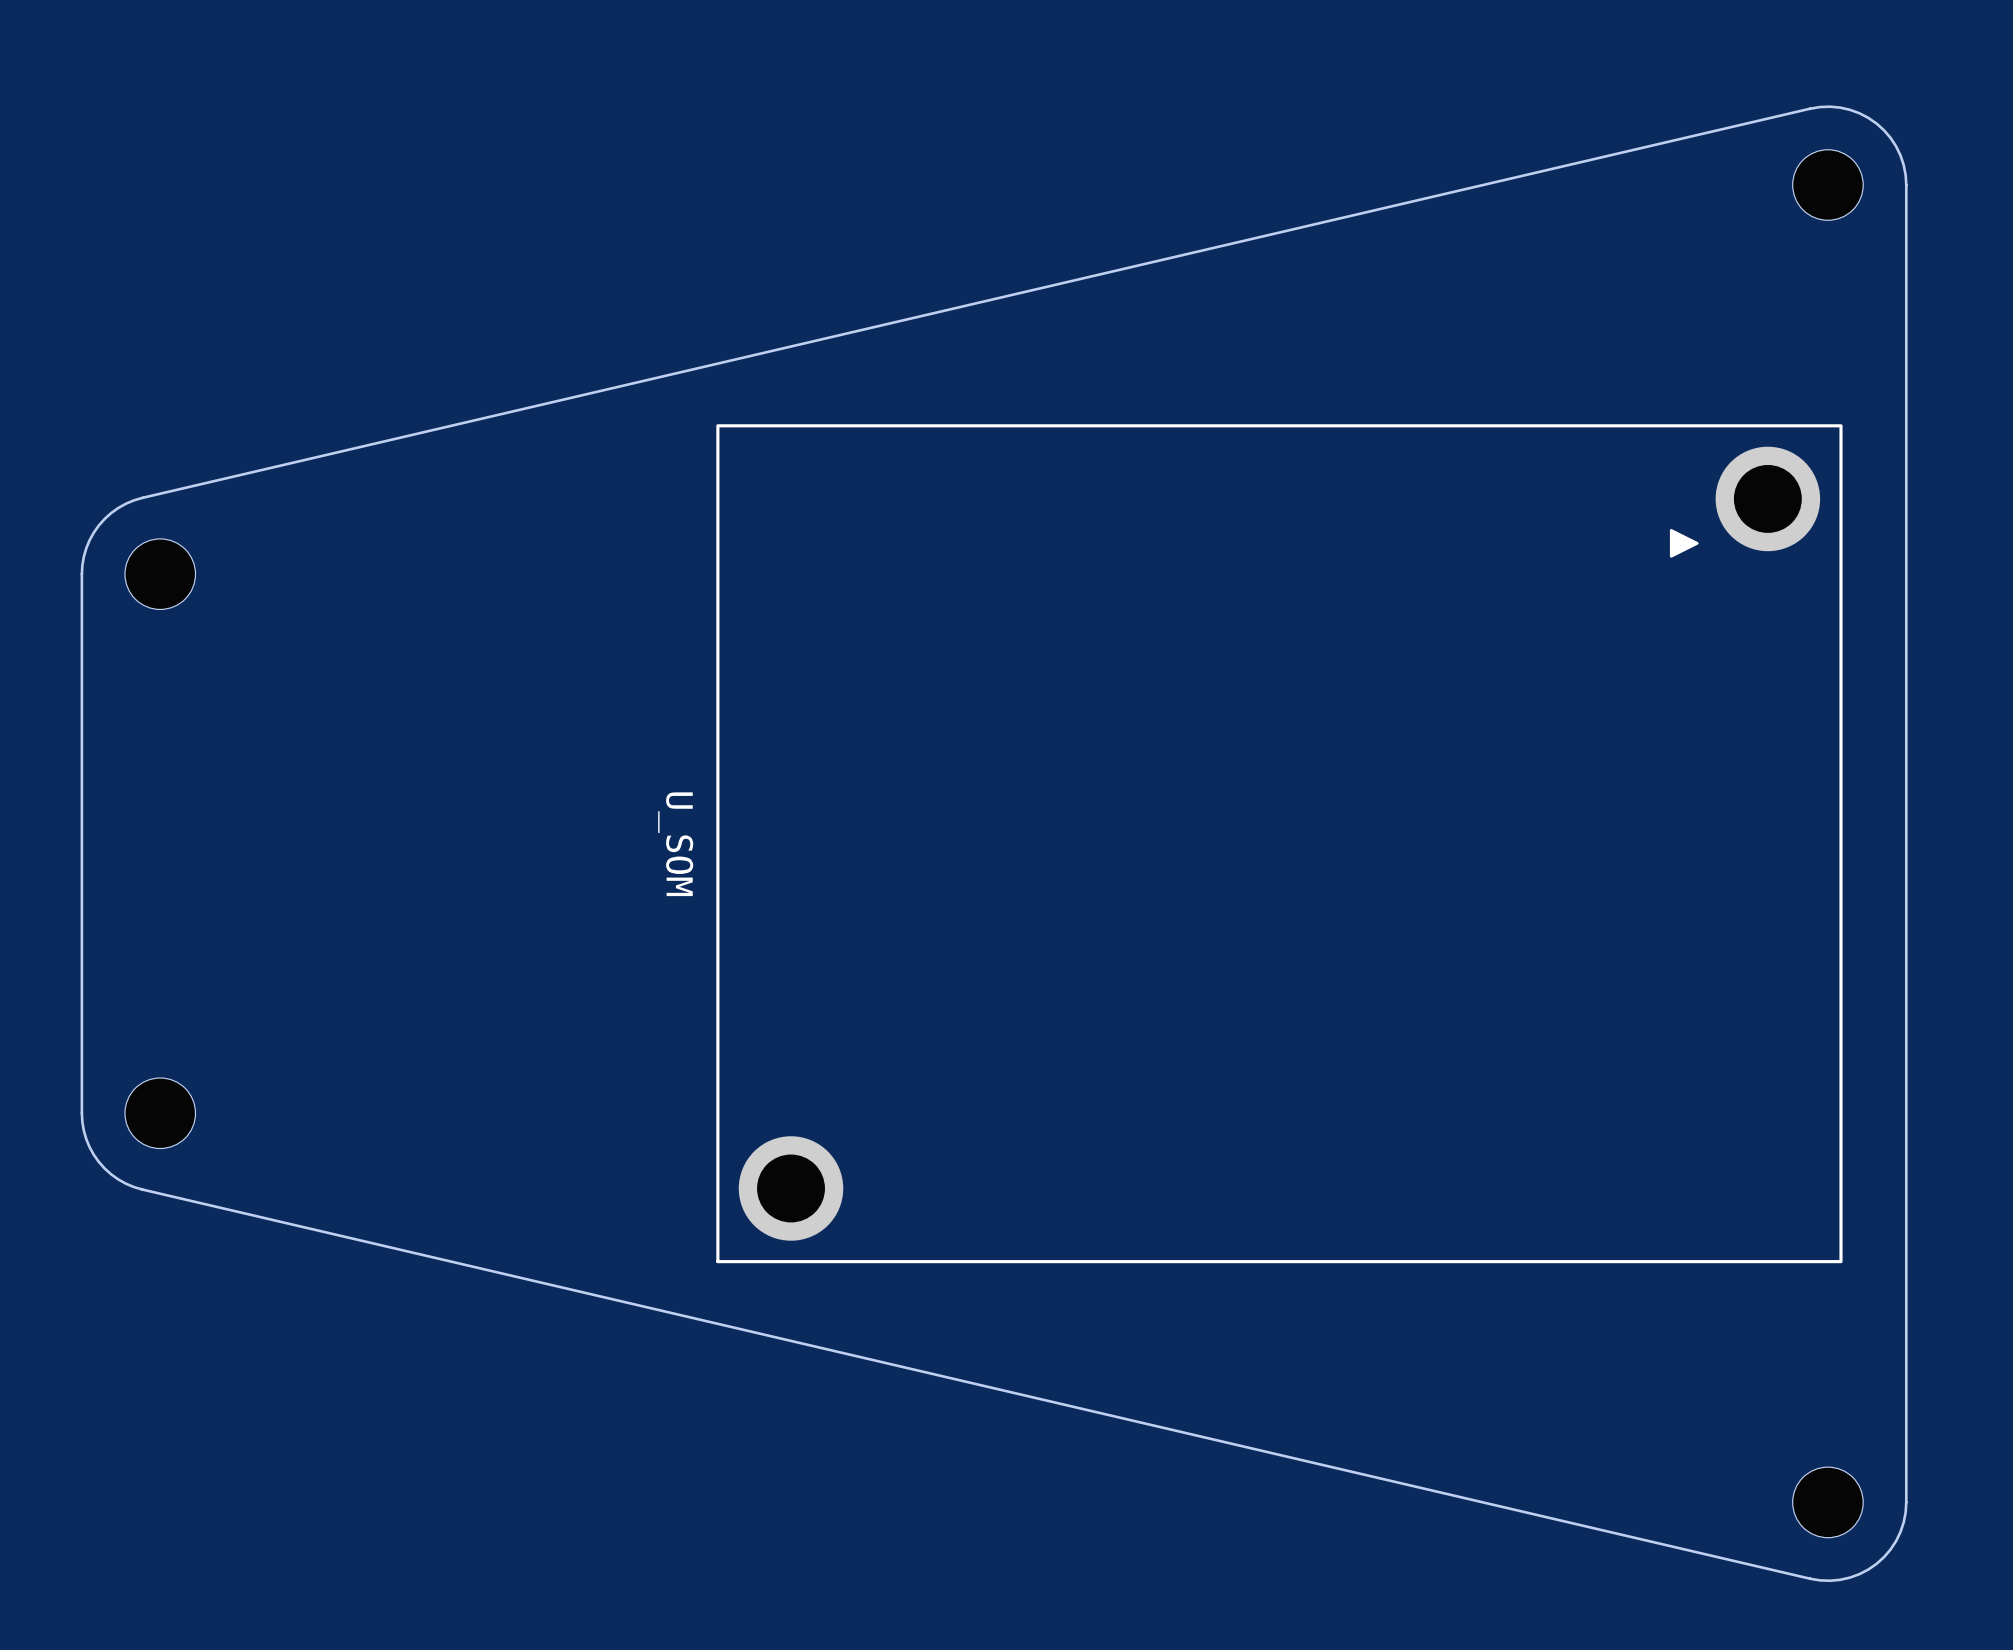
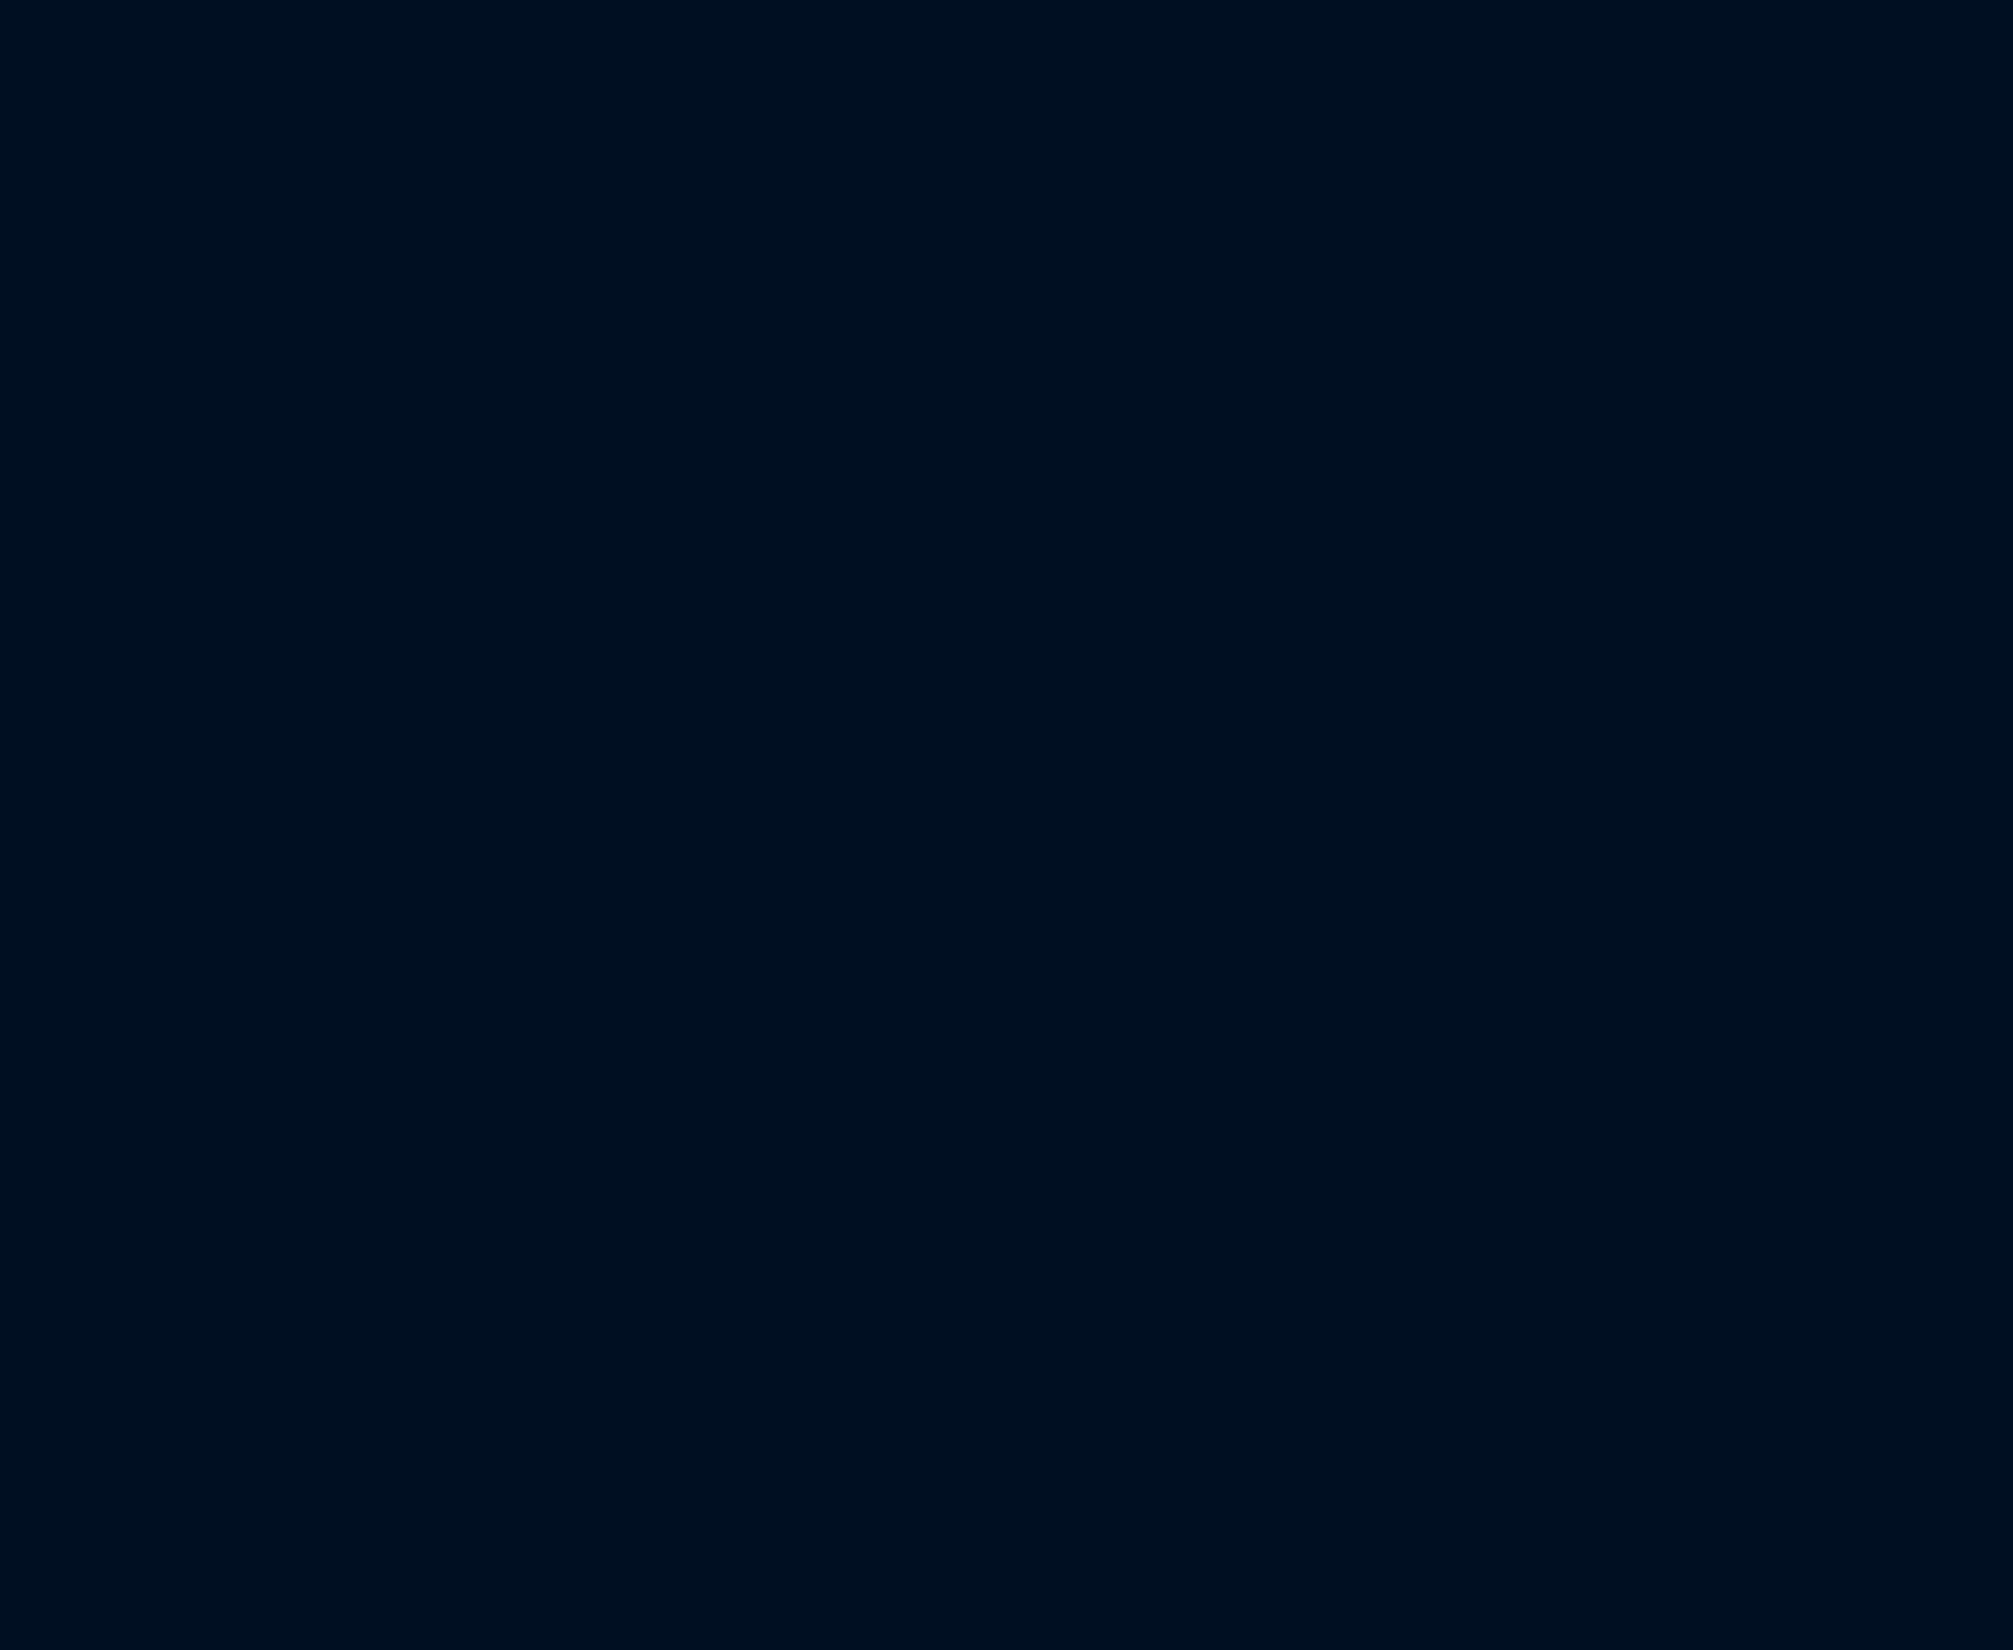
board edge: (1810, 108) (142, 497) (118, 507) (104, 518) (93, 532) (86, 548) (81, 574) (81, 1113) (83, 1130) (93, 1154) (104, 1168) (118, 1179) (142, 1189) (1810, 1578) (1840, 1579) (1868, 1569) (1884, 1557) (1896, 1540) (1903, 1522) (1906, 1502) (1906, 185) (1903, 165) (1896, 146) (1876, 123) (1849, 109) (1830, 106) (1810, 108) -> none
part: (1827, 185) -> none
part: (160, 574) -> none
U_SOM: (1279, 843) -> none
part: (160, 1113) -> none
part: (1827, 1502) -> none

